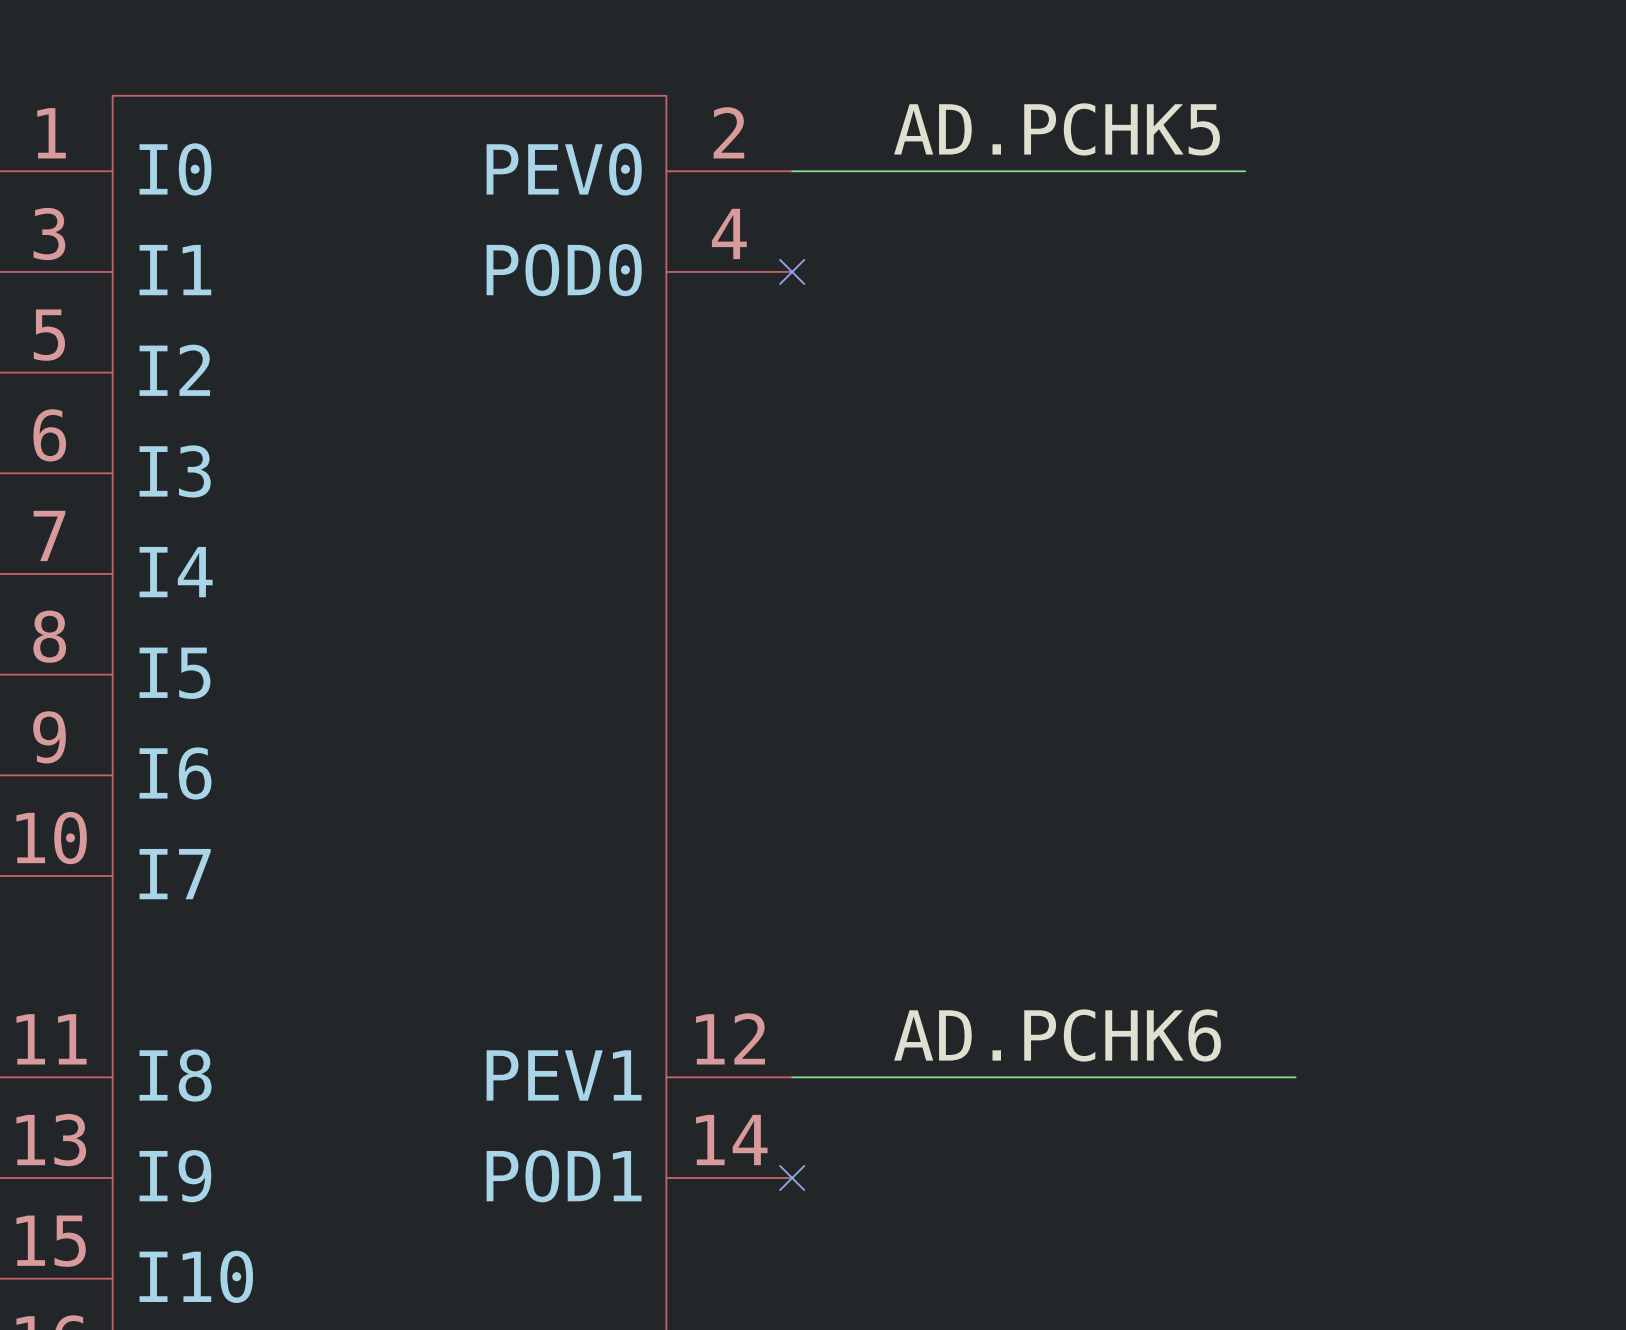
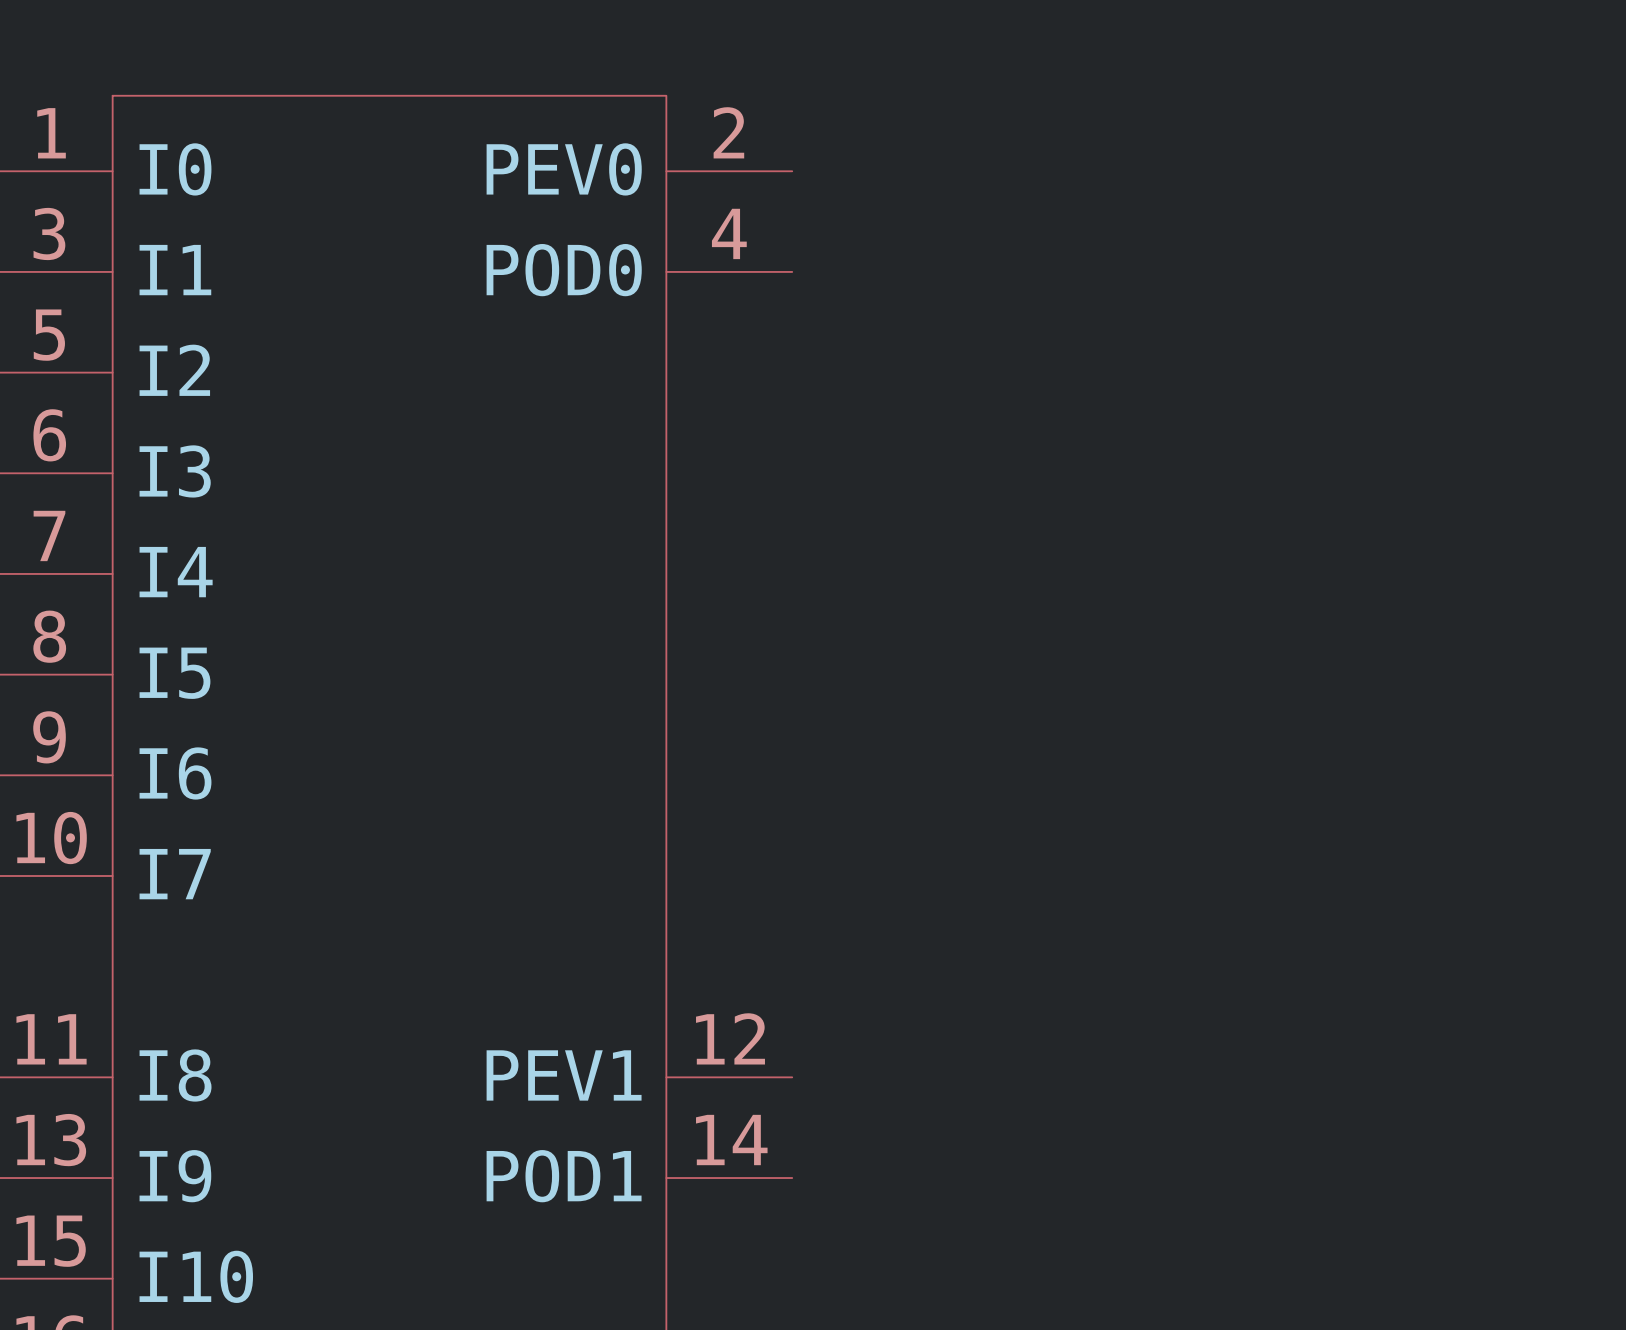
label: AD.PCHK5 (1057, 129) -> none
wire: (792, 171) (1245, 171) -> none
no-connect mark: (792, 271) -> none
label: AD.PCHK6 (1057, 1035) -> none
wire: (792, 1077) (1295, 1077) -> none
no-connect mark: (792, 1178) -> none

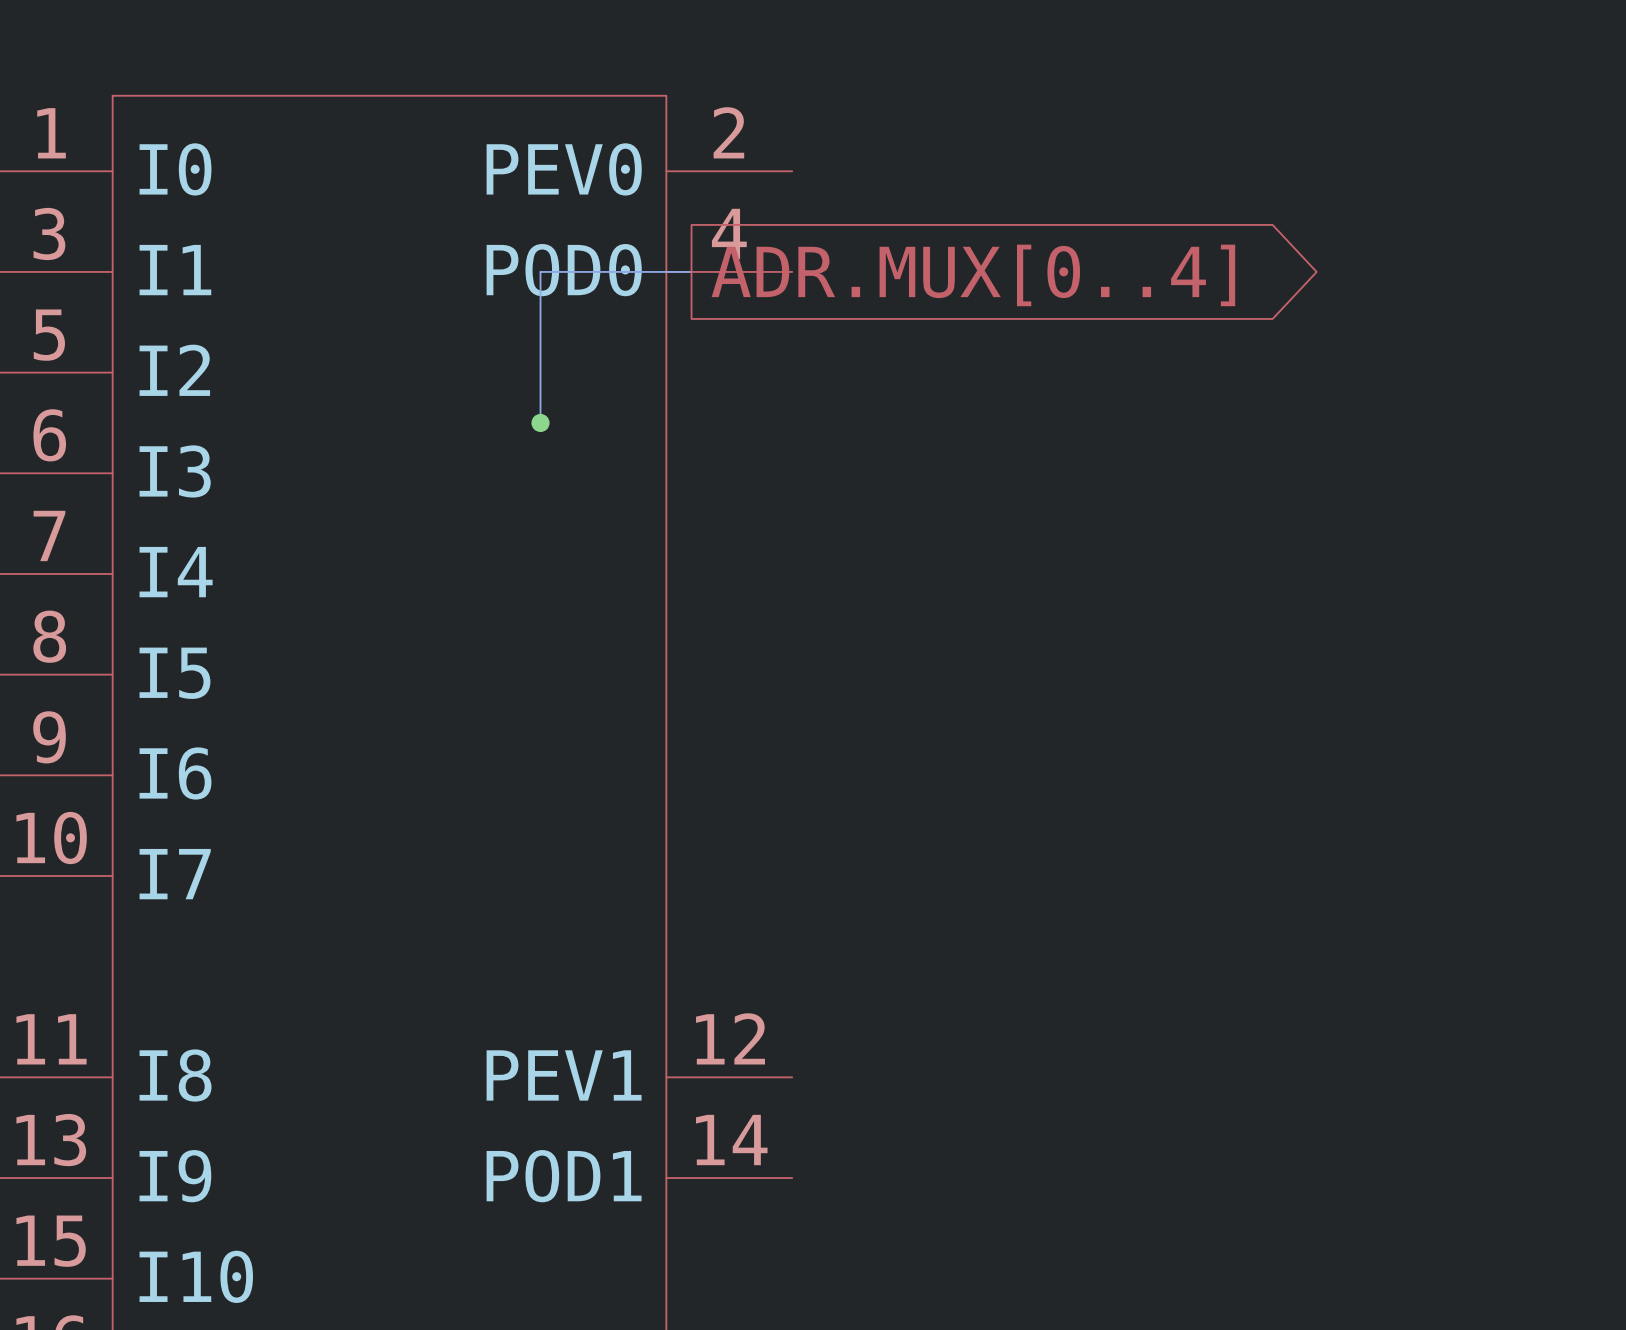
bus: none -> (691, 271) (540, 271) (540, 422)
global label: none -> ADR.MUX[0..4] (973, 275)
junction: none -> (540, 422)

